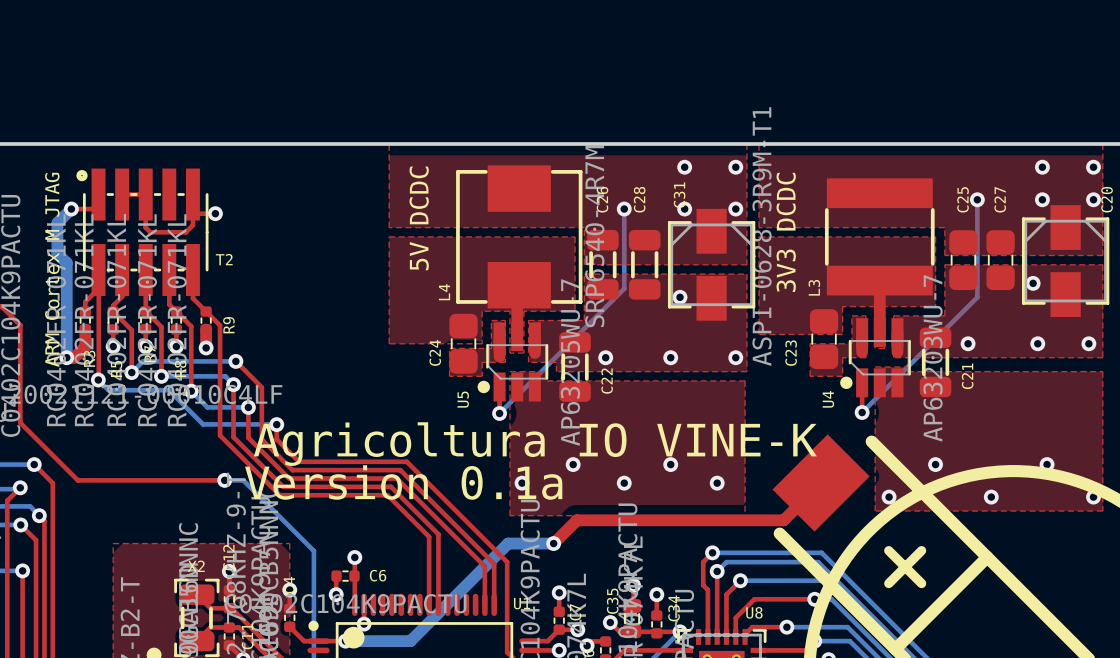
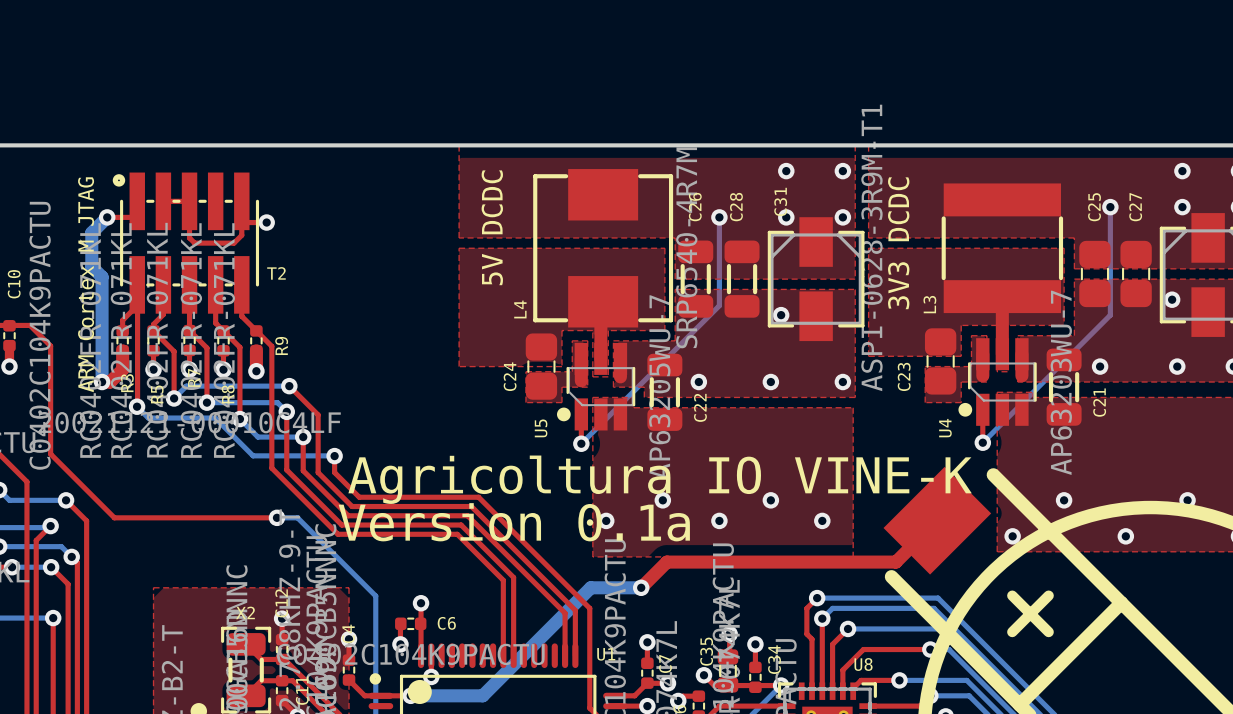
text position: Agricoltura IO VINE-K (535, 444) -> Agricoltura IO VINE-K (660, 479)
text position: Version 0.1a (403, 482) -> Version 0.1a (514, 522)

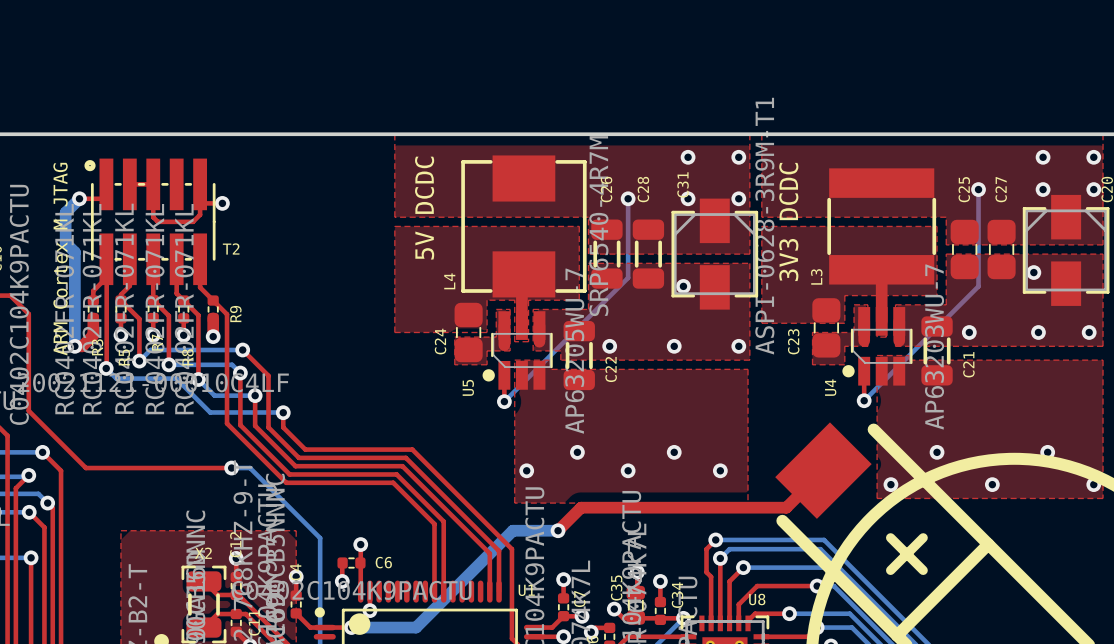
text: Agricoltura IO VINE-K (660, 479) -> none
text: Version 0.1a (514, 522) -> none

